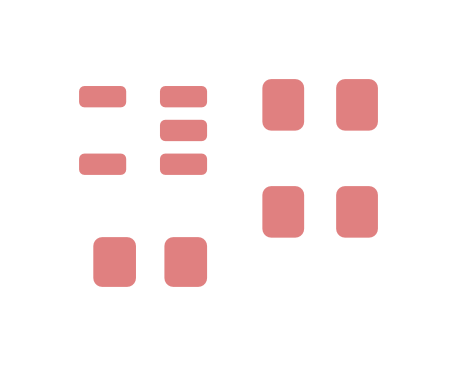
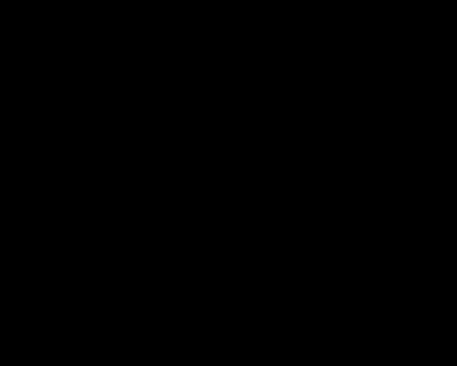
part: (320, 104) -> none
part: (143, 130) -> none
part: (320, 211) -> none
part: (150, 262) -> none

